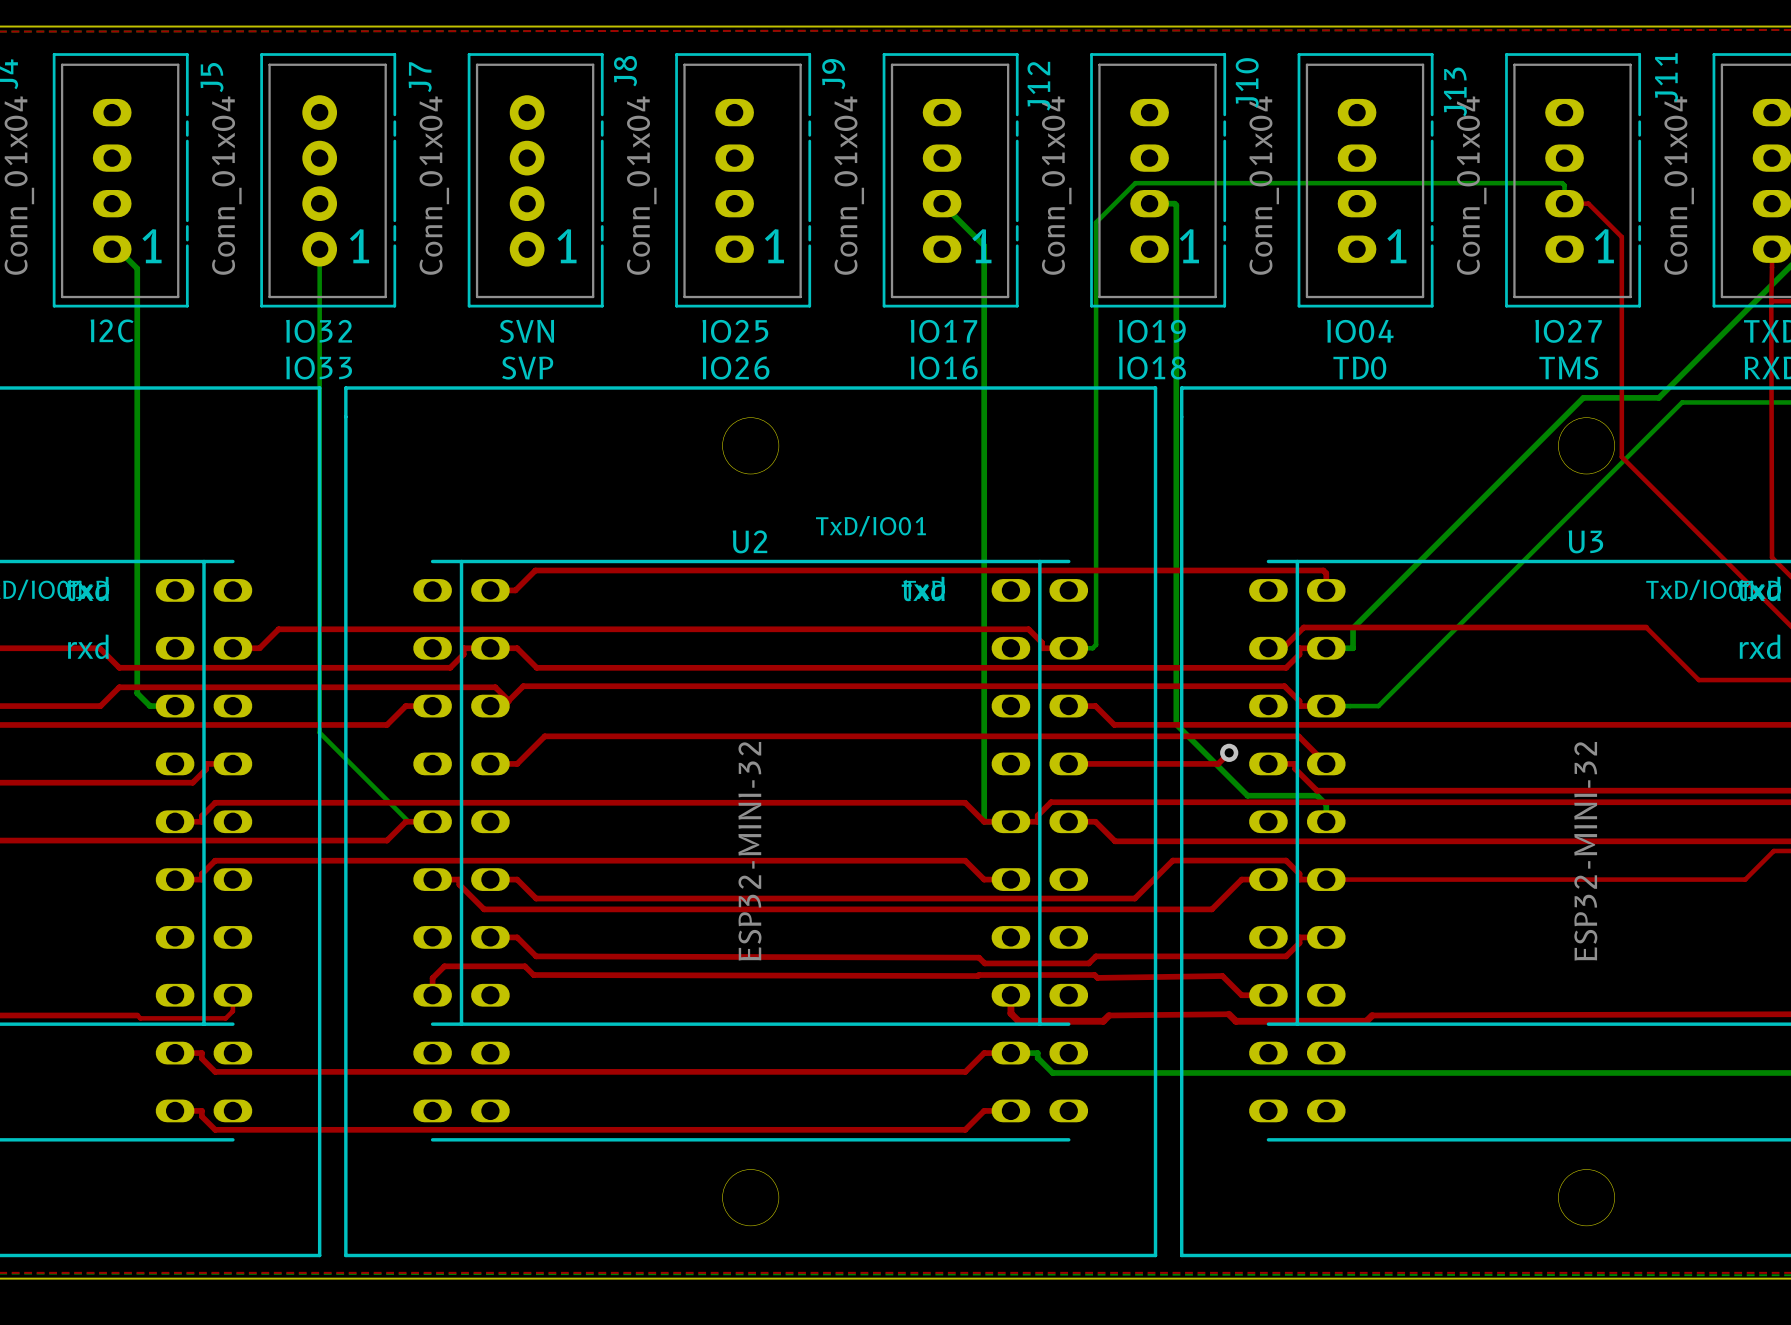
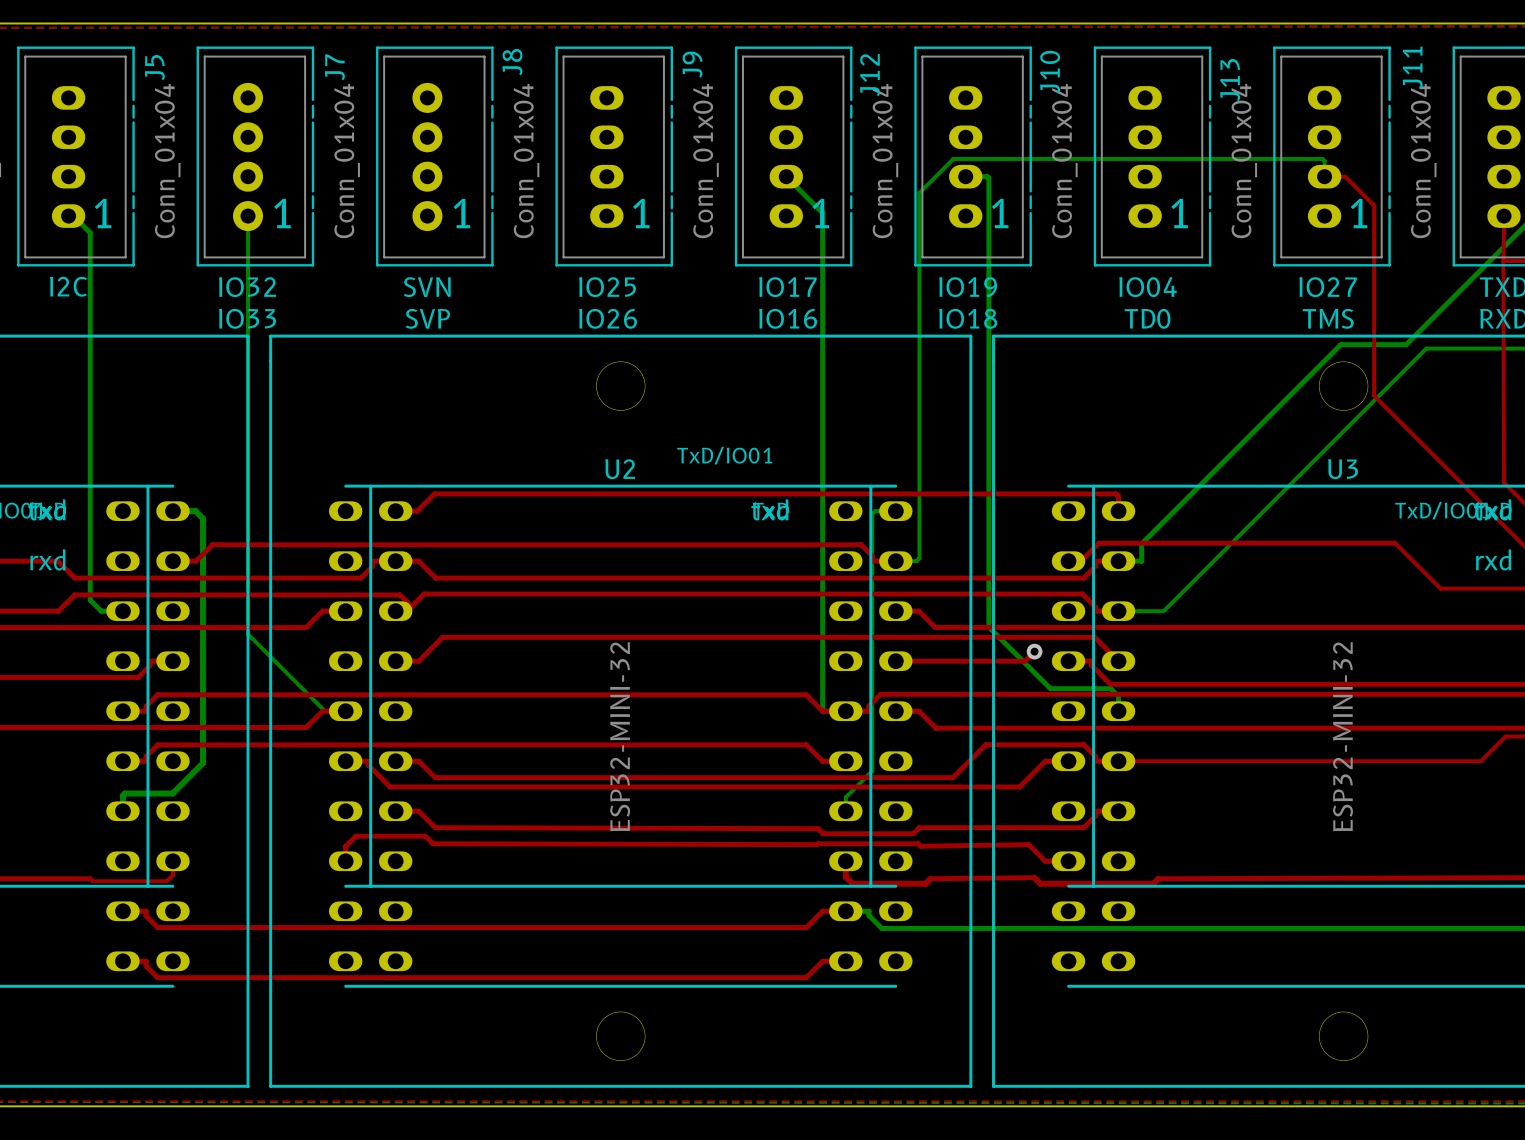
bottom track: none -> (172, 511) (195, 511) (202, 518) (202, 763) (172, 793) (124, 793) (122, 795) (122, 811)
bottom track: none -> (895, 511) (875, 511) (872, 514) (872, 771) (845, 797) (845, 811)

